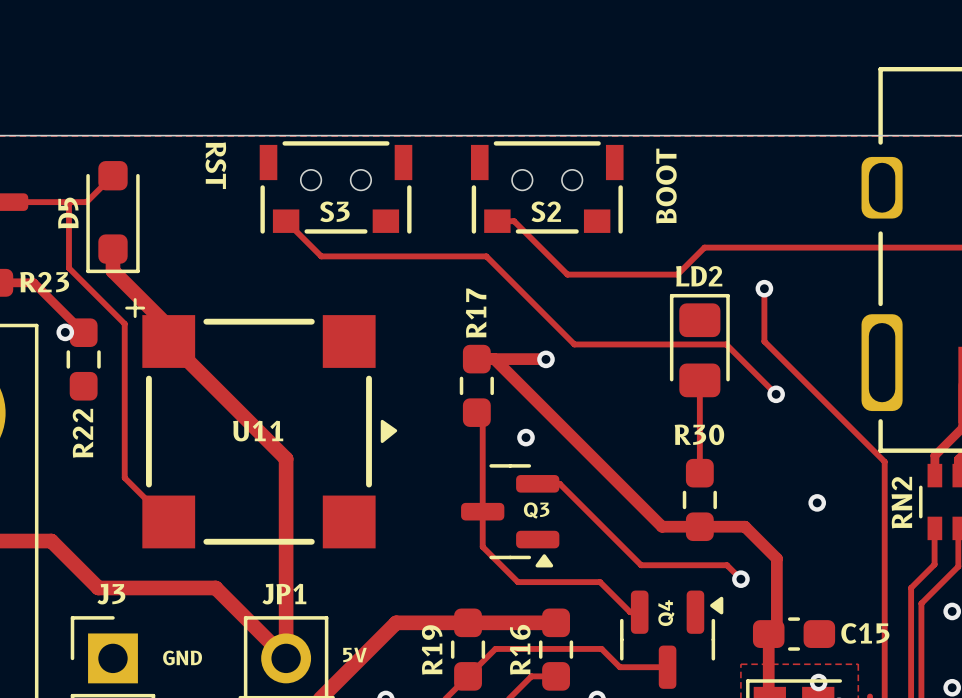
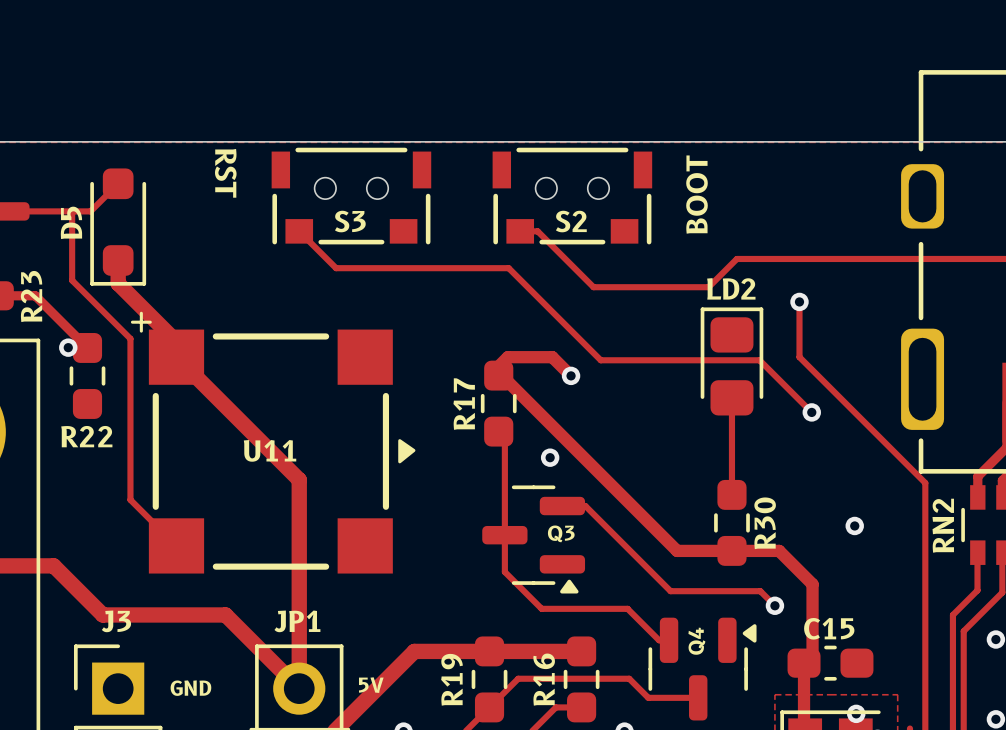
R23 name rotation: 0° (44, 282) -> 90° counterclockwise (31, 296)
R17 name position: R17 (476, 313) -> R17 (464, 404)
track: (476, 359) (545, 359) -> none
track: (494, 359) (662, 526) -> (570, 375) (552, 357) (507, 357) (495, 369) (677, 550) (692, 550)
R22 name rotation: 0° (82, 433) -> 90° clockwise (86, 436)
R30 name rotation: 0° (699, 434) -> 90° counterclockwise (765, 523)
R30 name position: R30 (699, 434) -> R30 (765, 523)
C15 name position: C15 (865, 633) -> C15 (829, 628)

